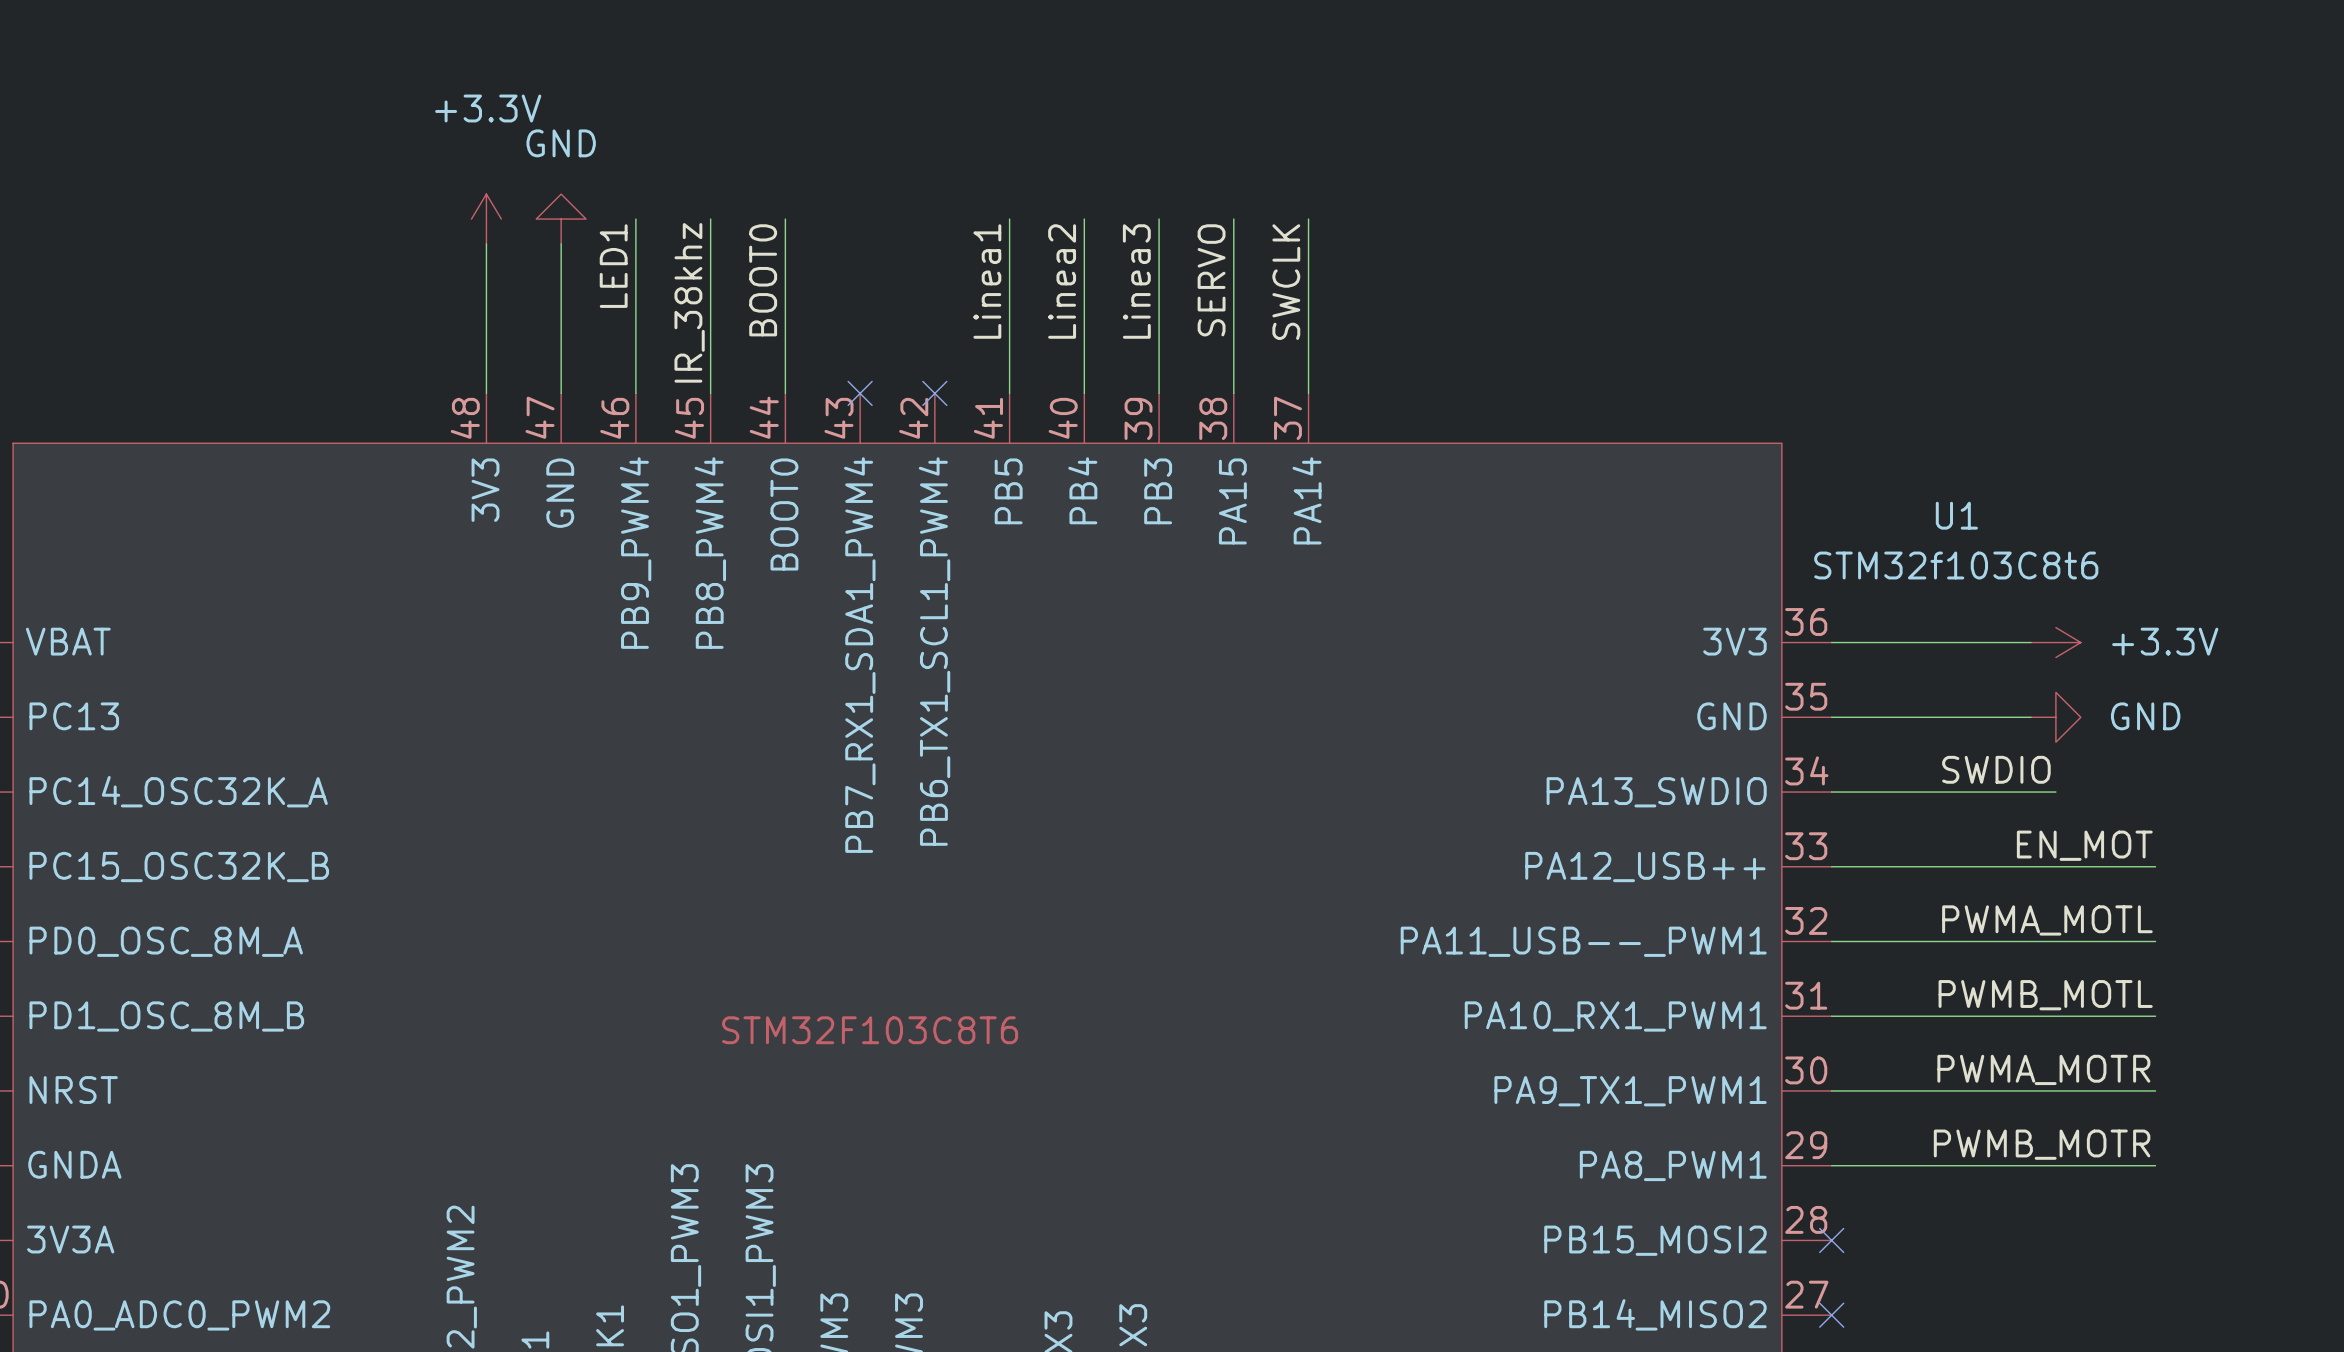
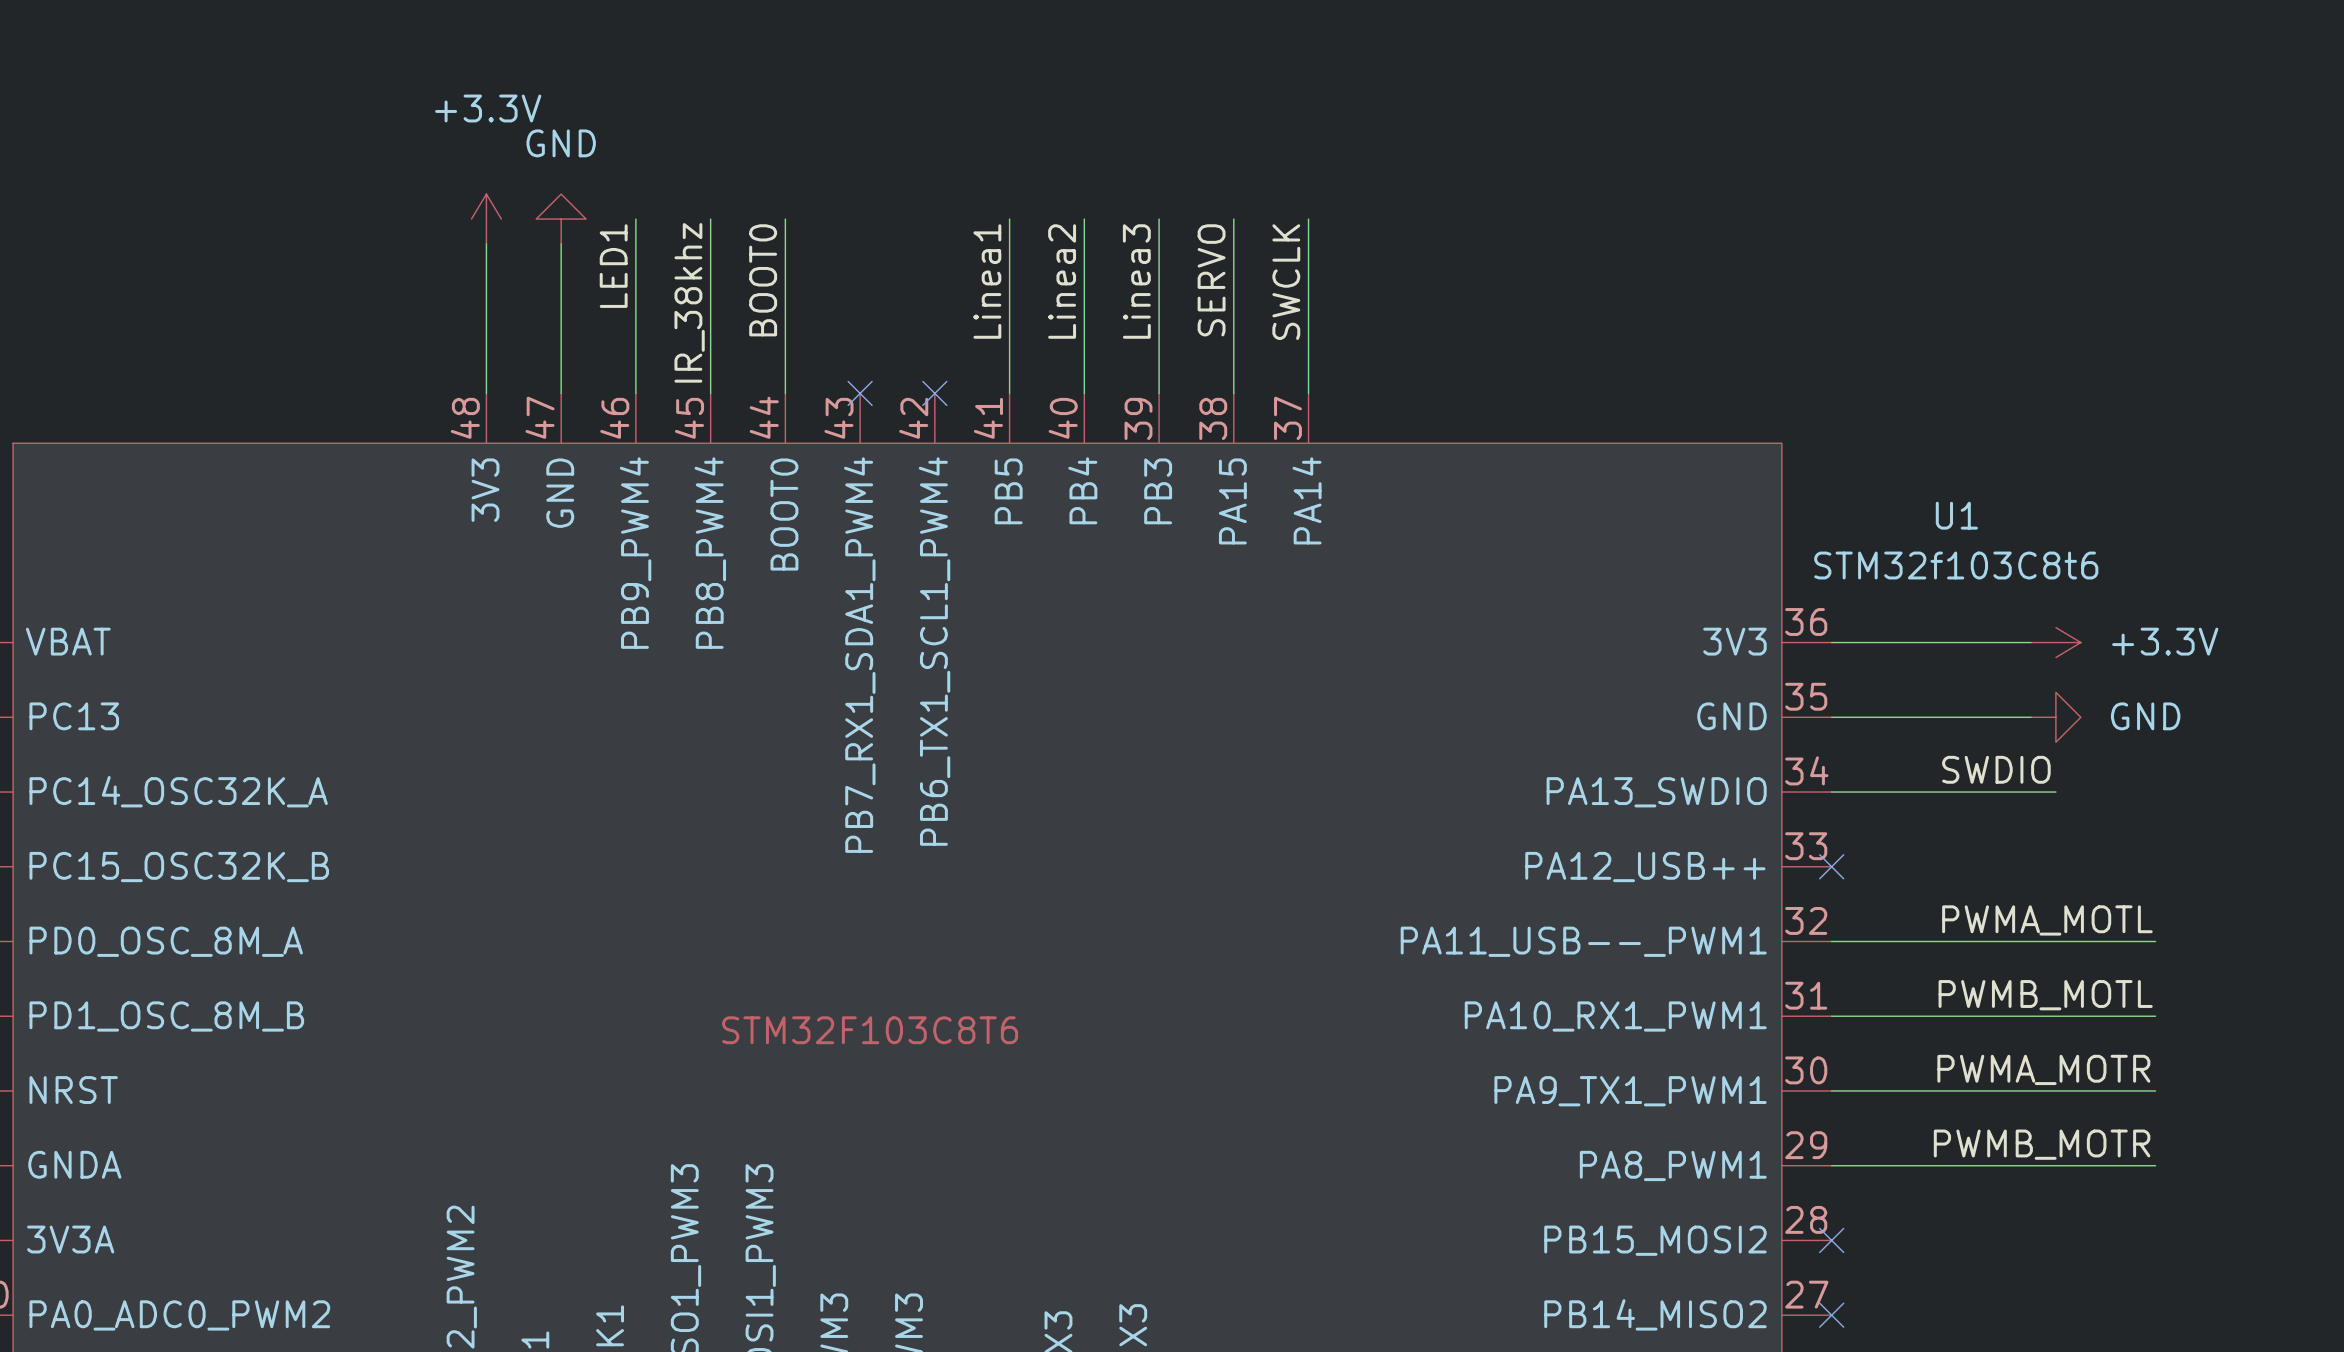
label: EN_MOT (2084, 845) -> none
wire: (1831, 866) (2155, 866) -> none
no-connect mark: none -> (1831, 866)

